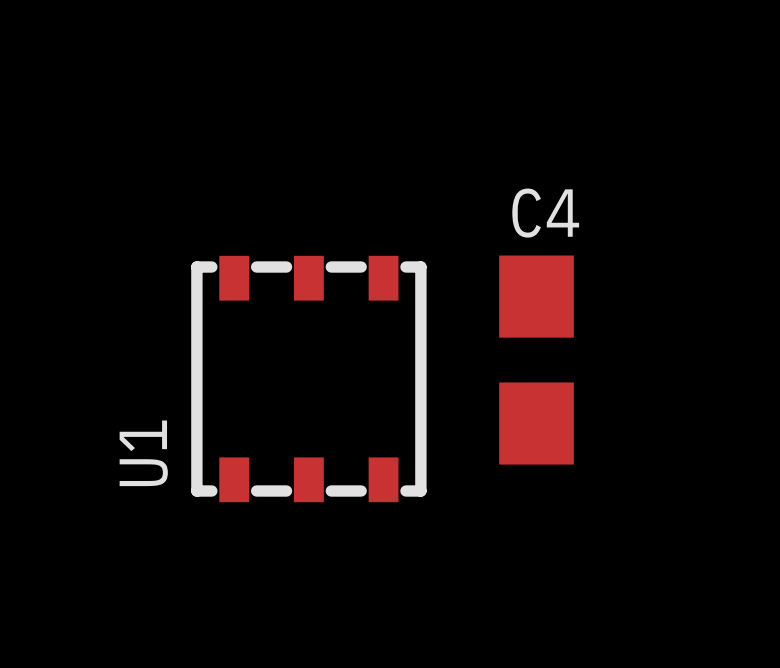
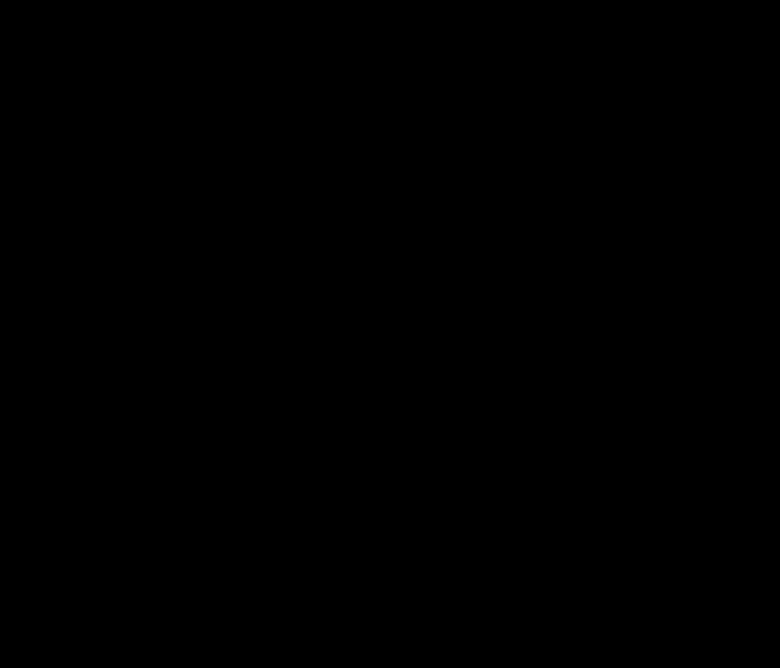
C4: (536, 360) -> none
U1: (308, 379) -> none

